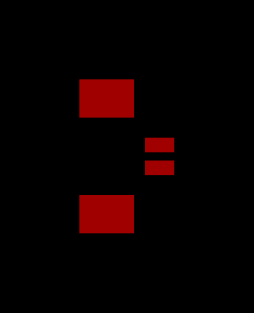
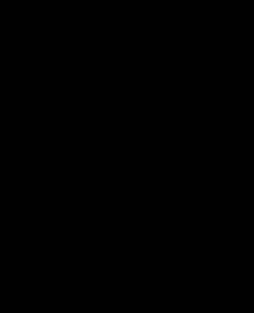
part: (126, 156) -> none

